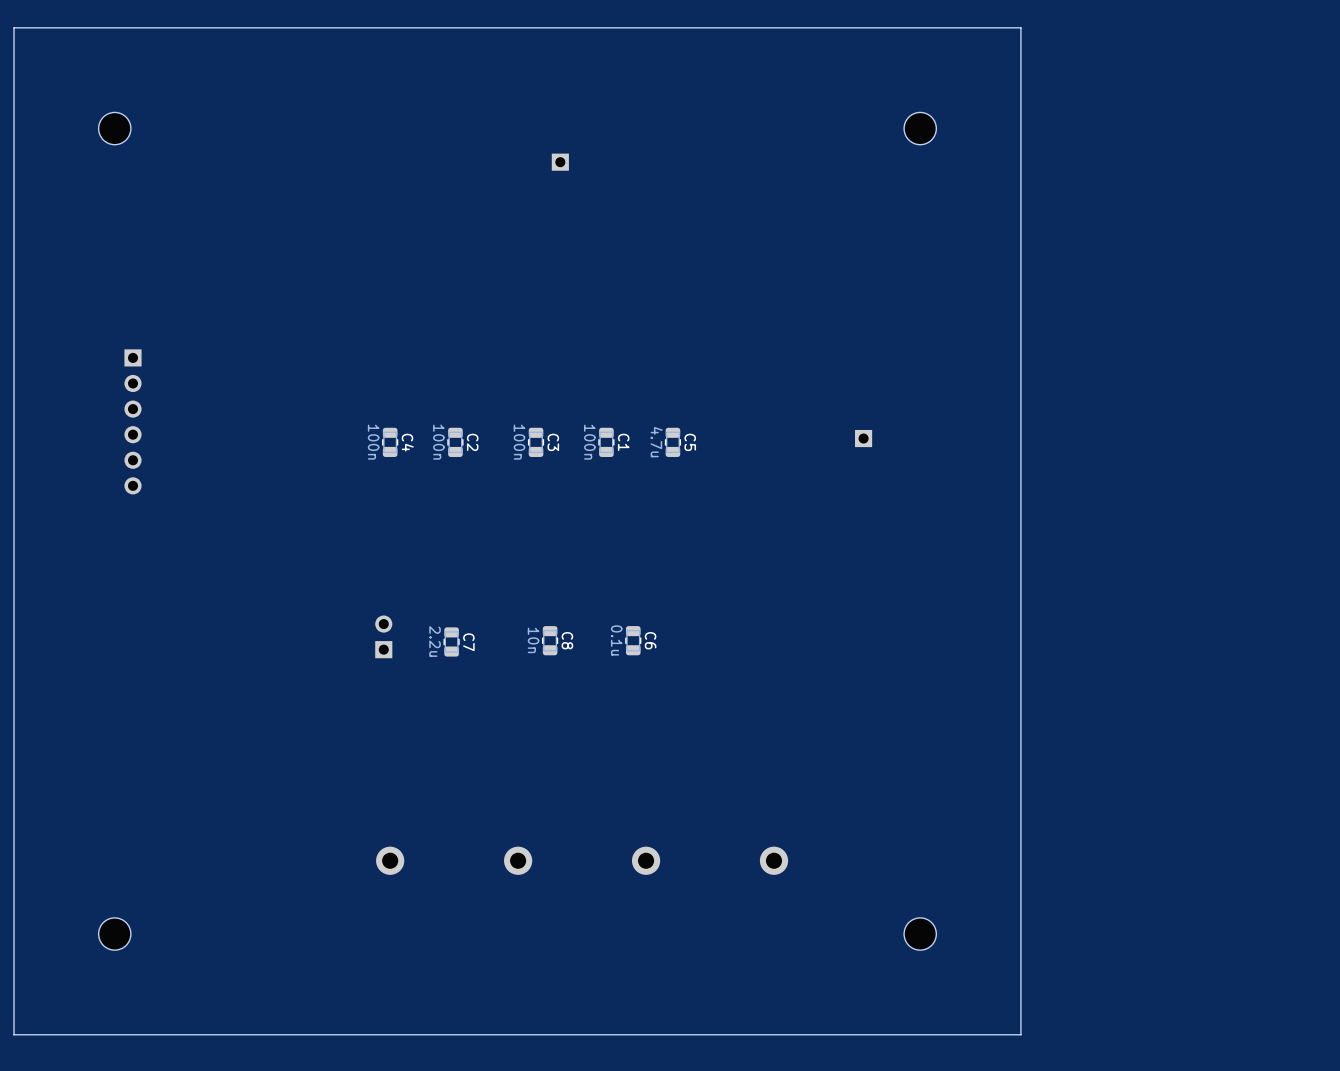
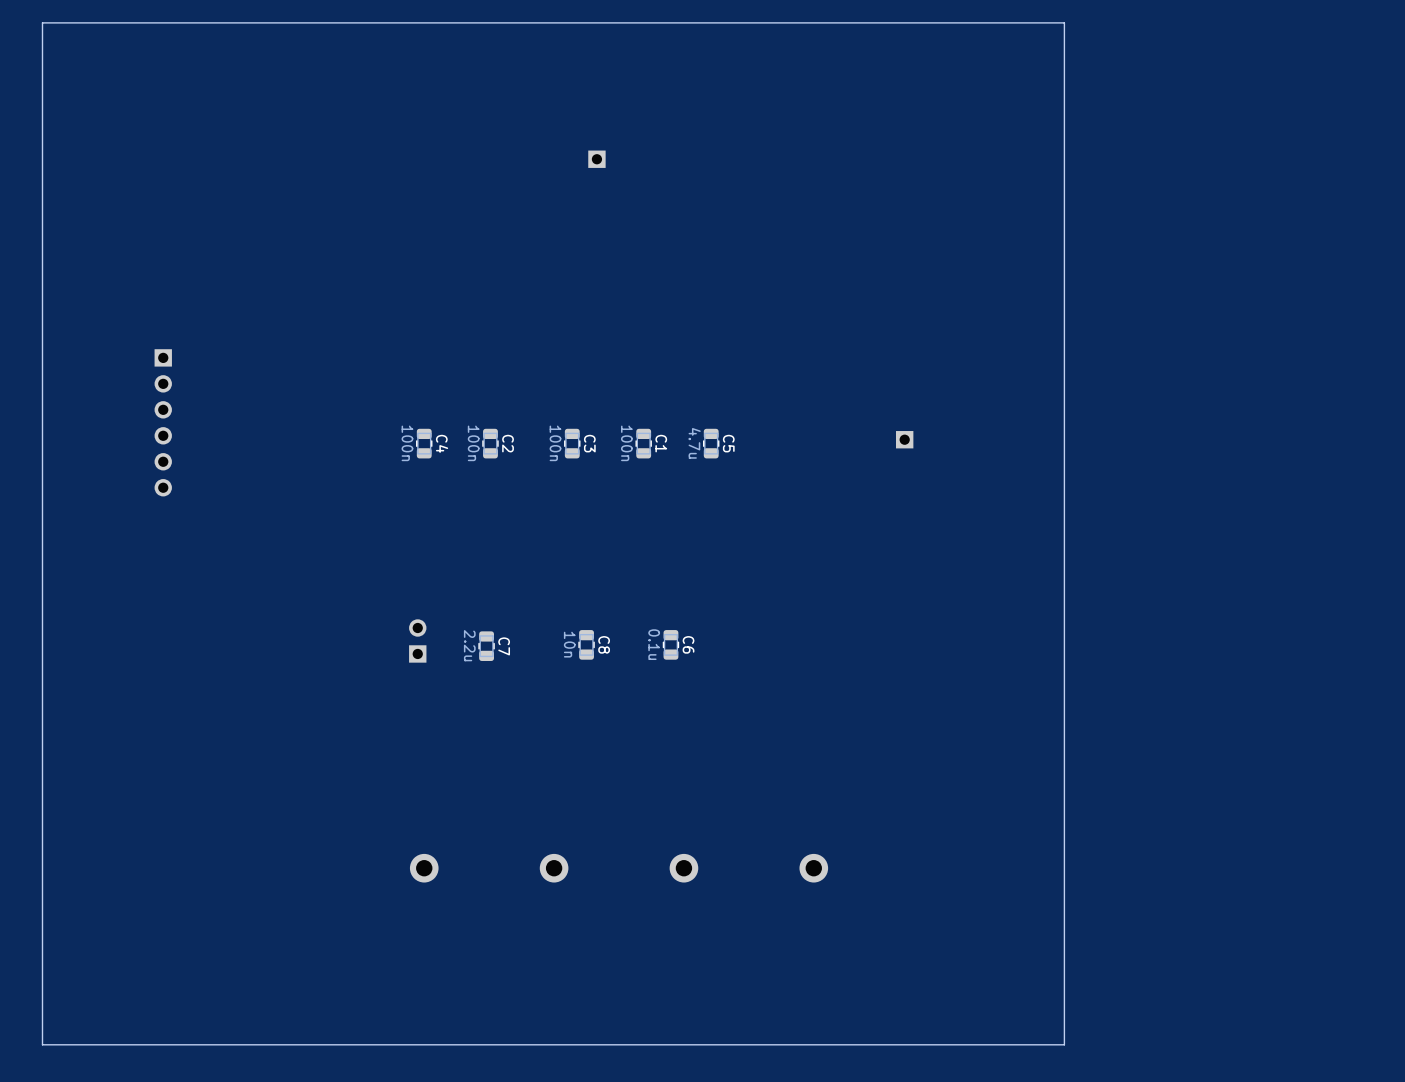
part: (114, 128) -> none
part: (920, 128) -> none
part: (114, 934) -> none
part: (920, 934) -> none

